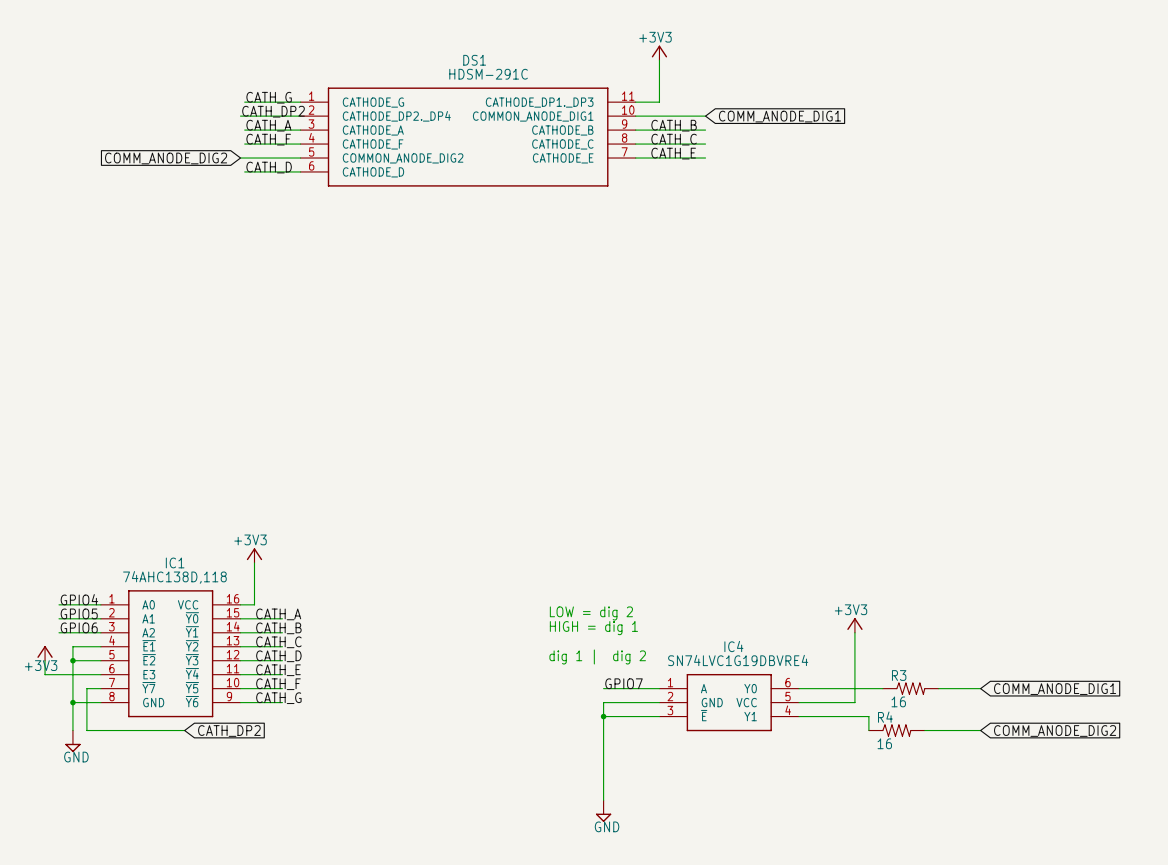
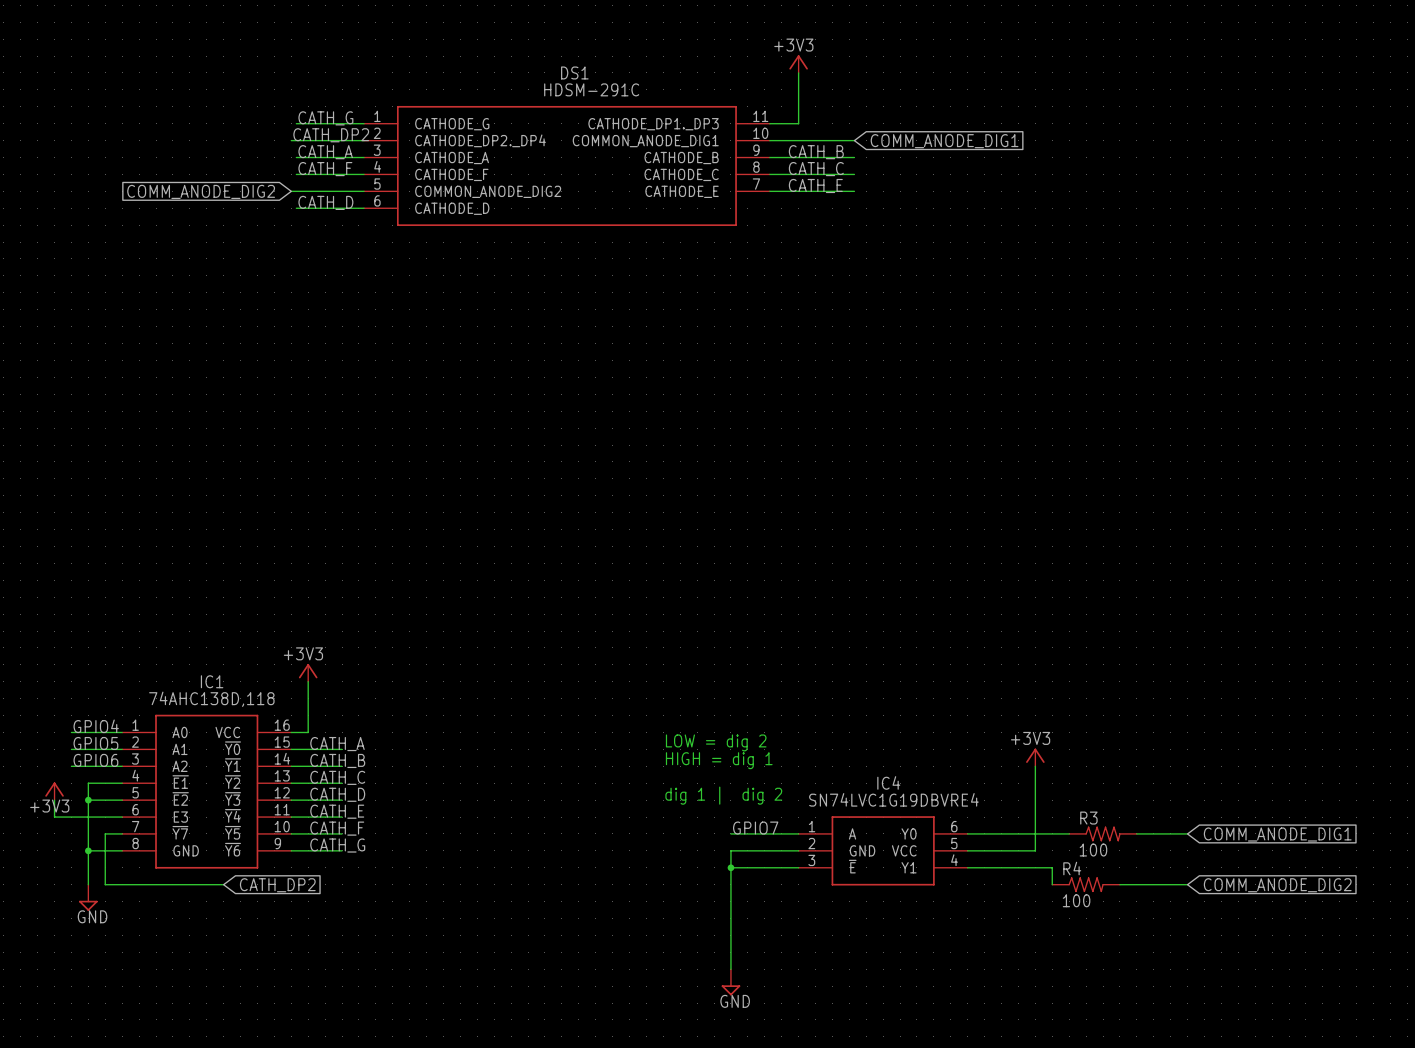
R3 value: 16 (898, 701) -> 100 (1093, 850)
R4 value: 16 (884, 743) -> 100 (1076, 900)

